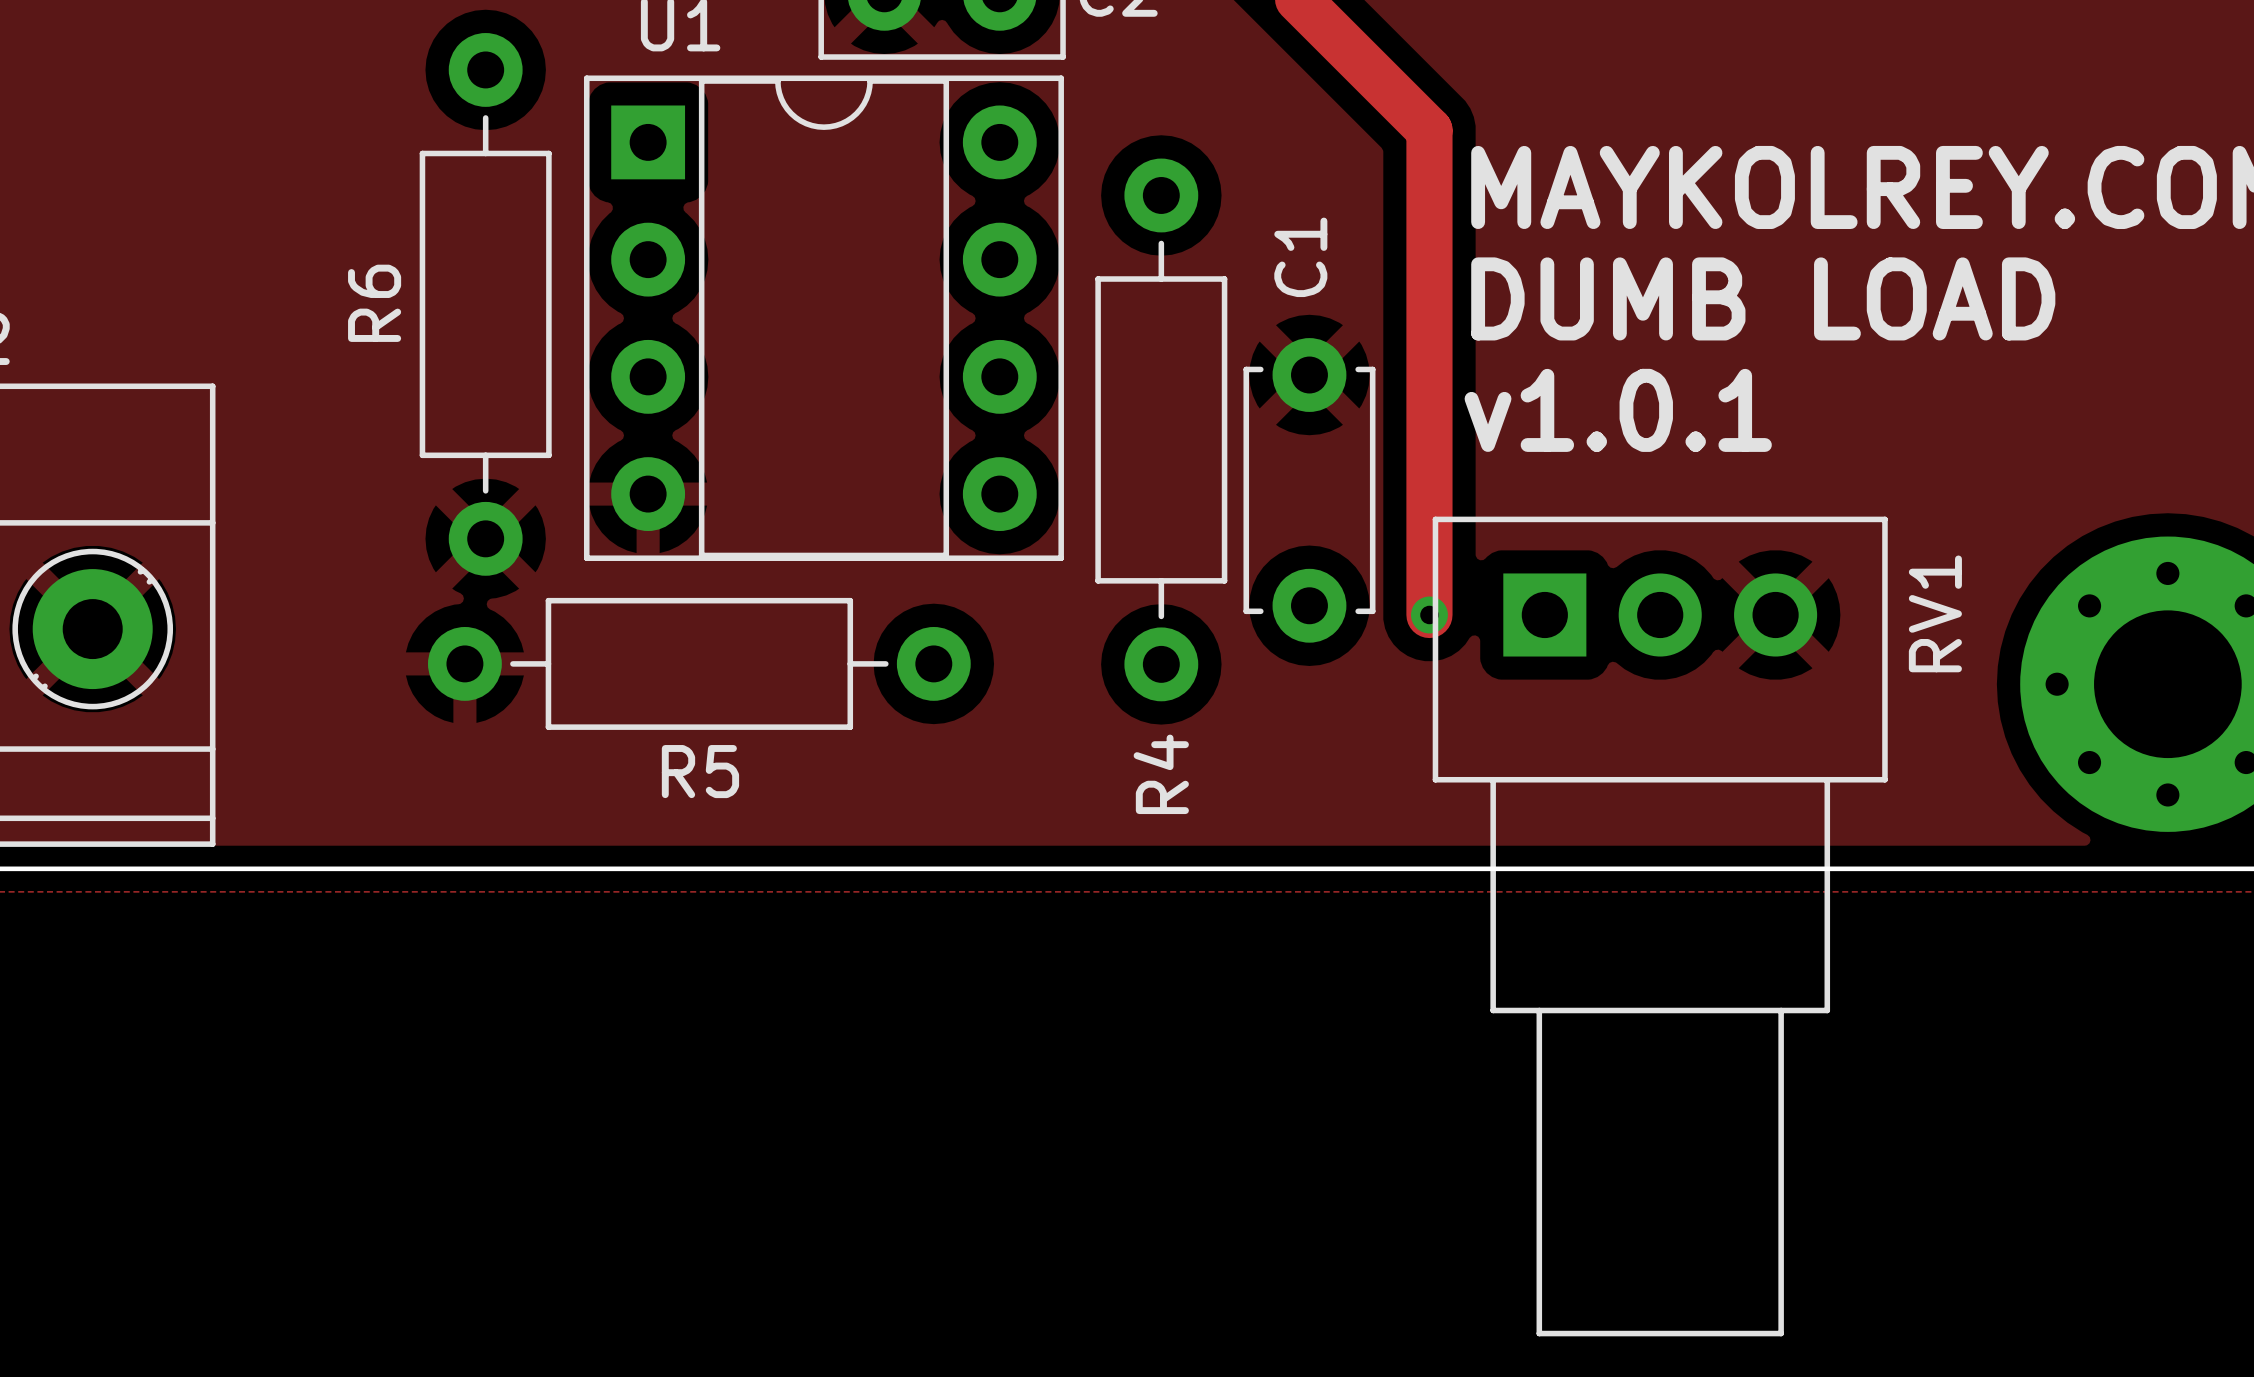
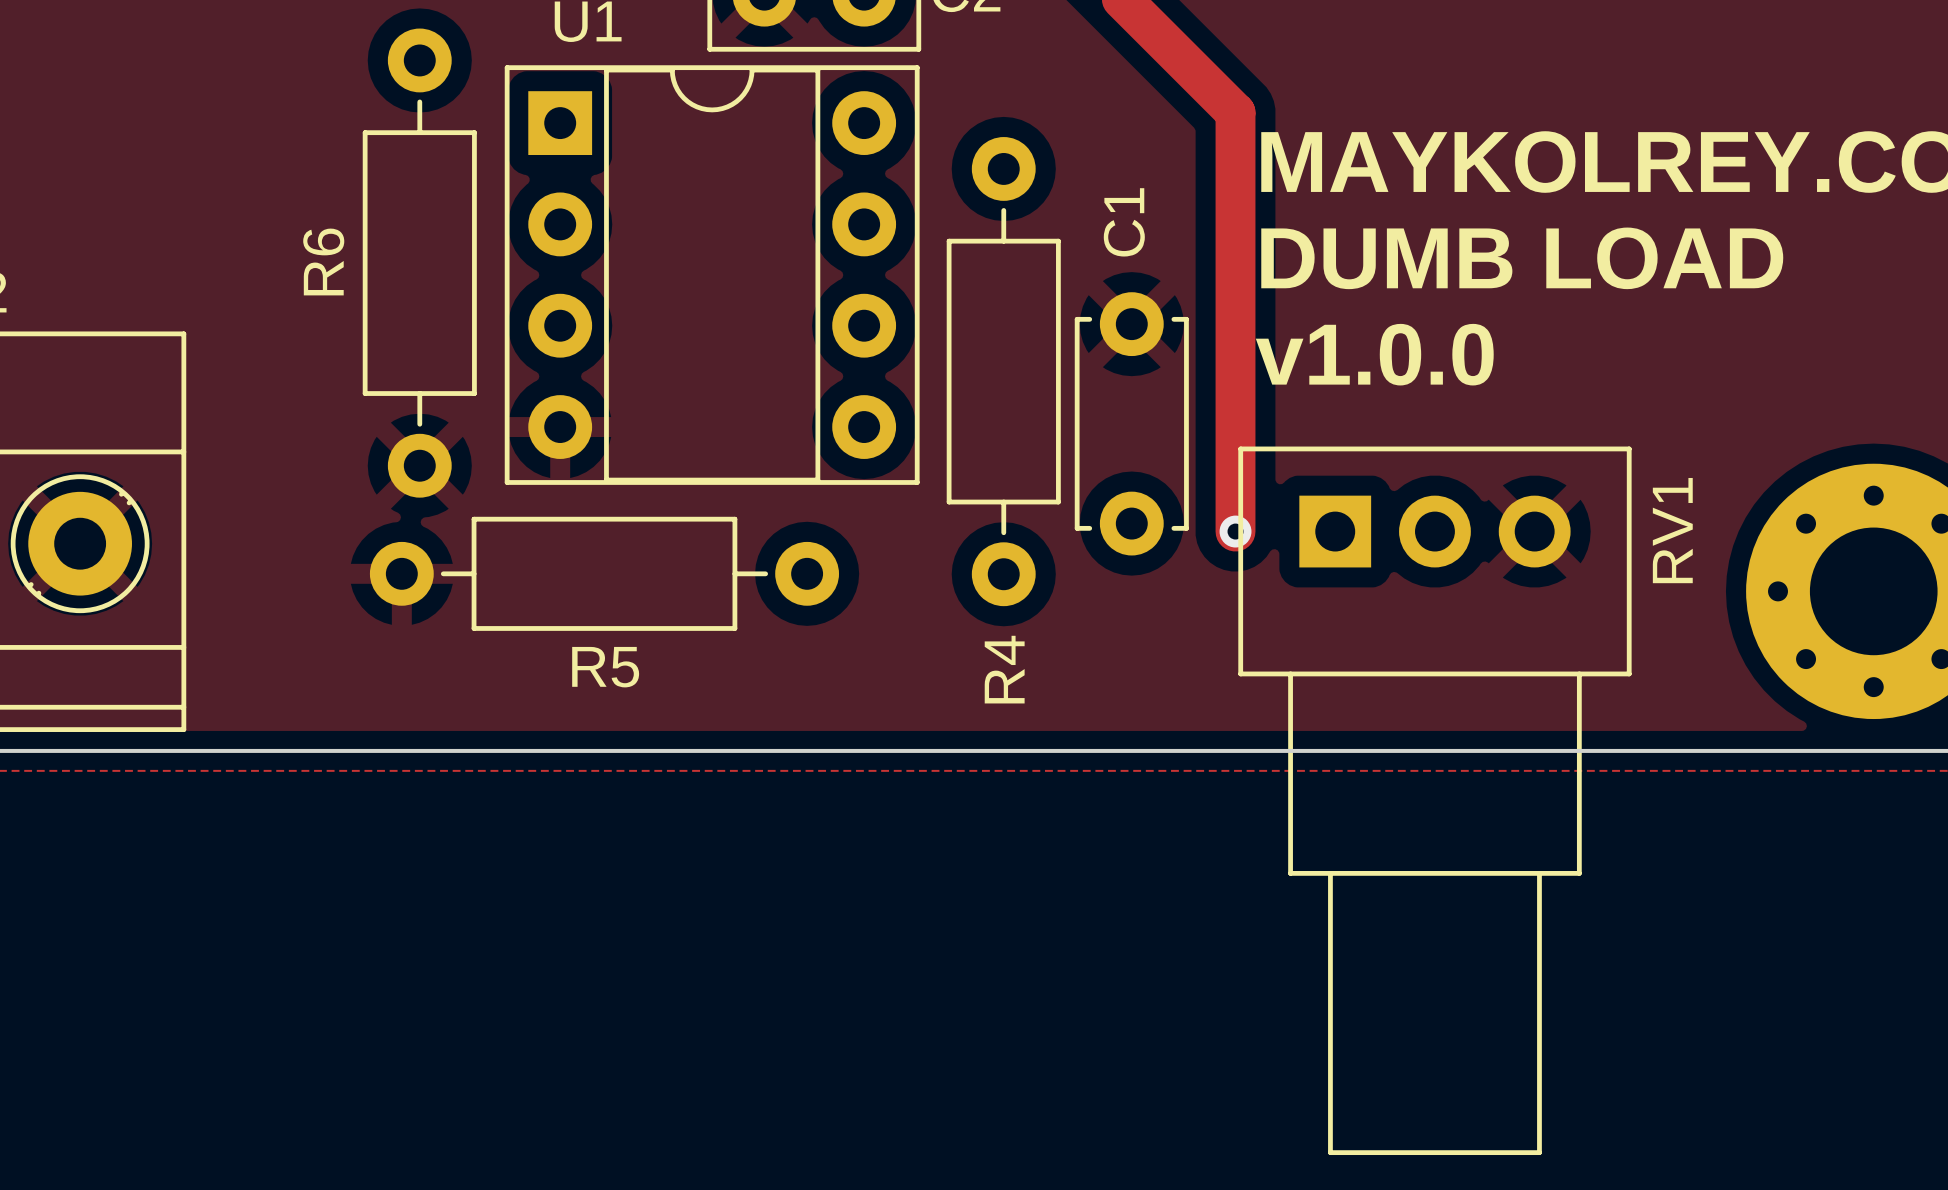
text: v1.0.1 (1618, 410) -> v1.0.0 (1374, 354)

